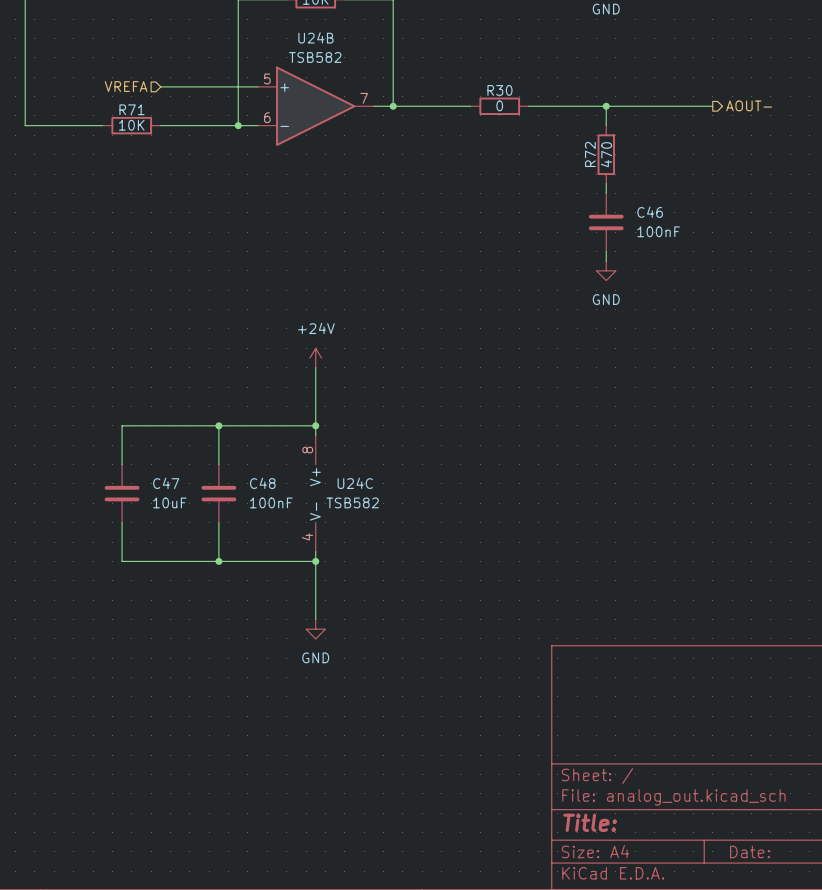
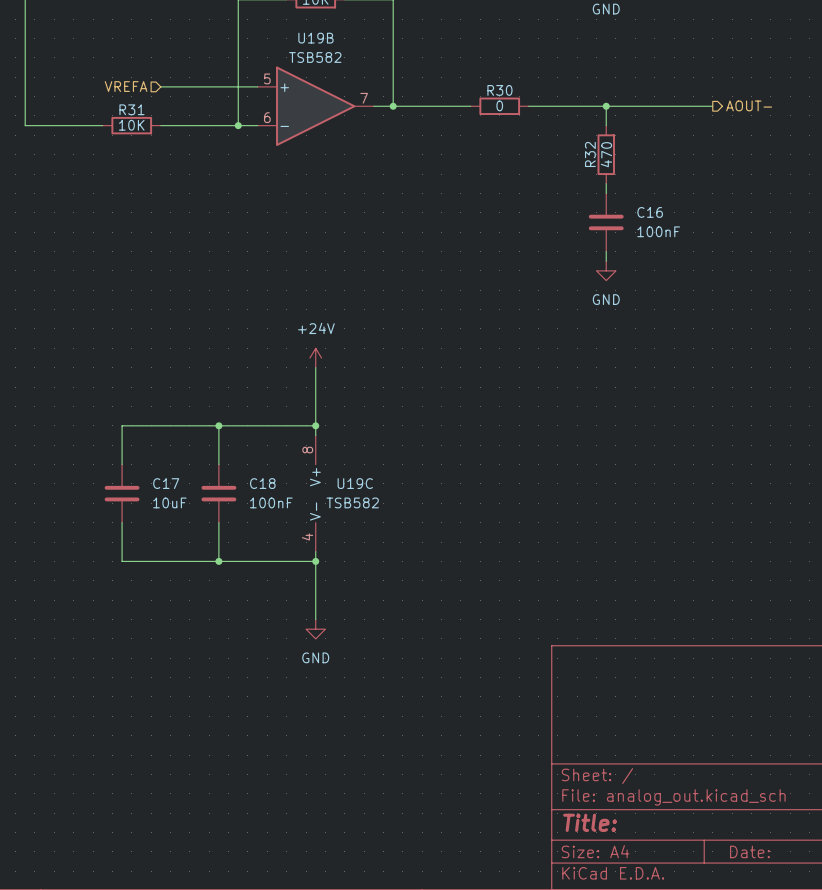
U24B name: U24B (315, 37) -> U19B (315, 38)
R71 name: R71 (131, 109) -> R31 (131, 109)
R72 name: R72 (590, 154) -> R32 (590, 154)
C46 name: C46 (650, 212) -> C16 (650, 212)
C47 name: C47 (166, 483) -> C17 (166, 483)
C48 name: C48 (262, 483) -> C18 (262, 483)
U24C name: U24C (355, 483) -> U19C (355, 483)

